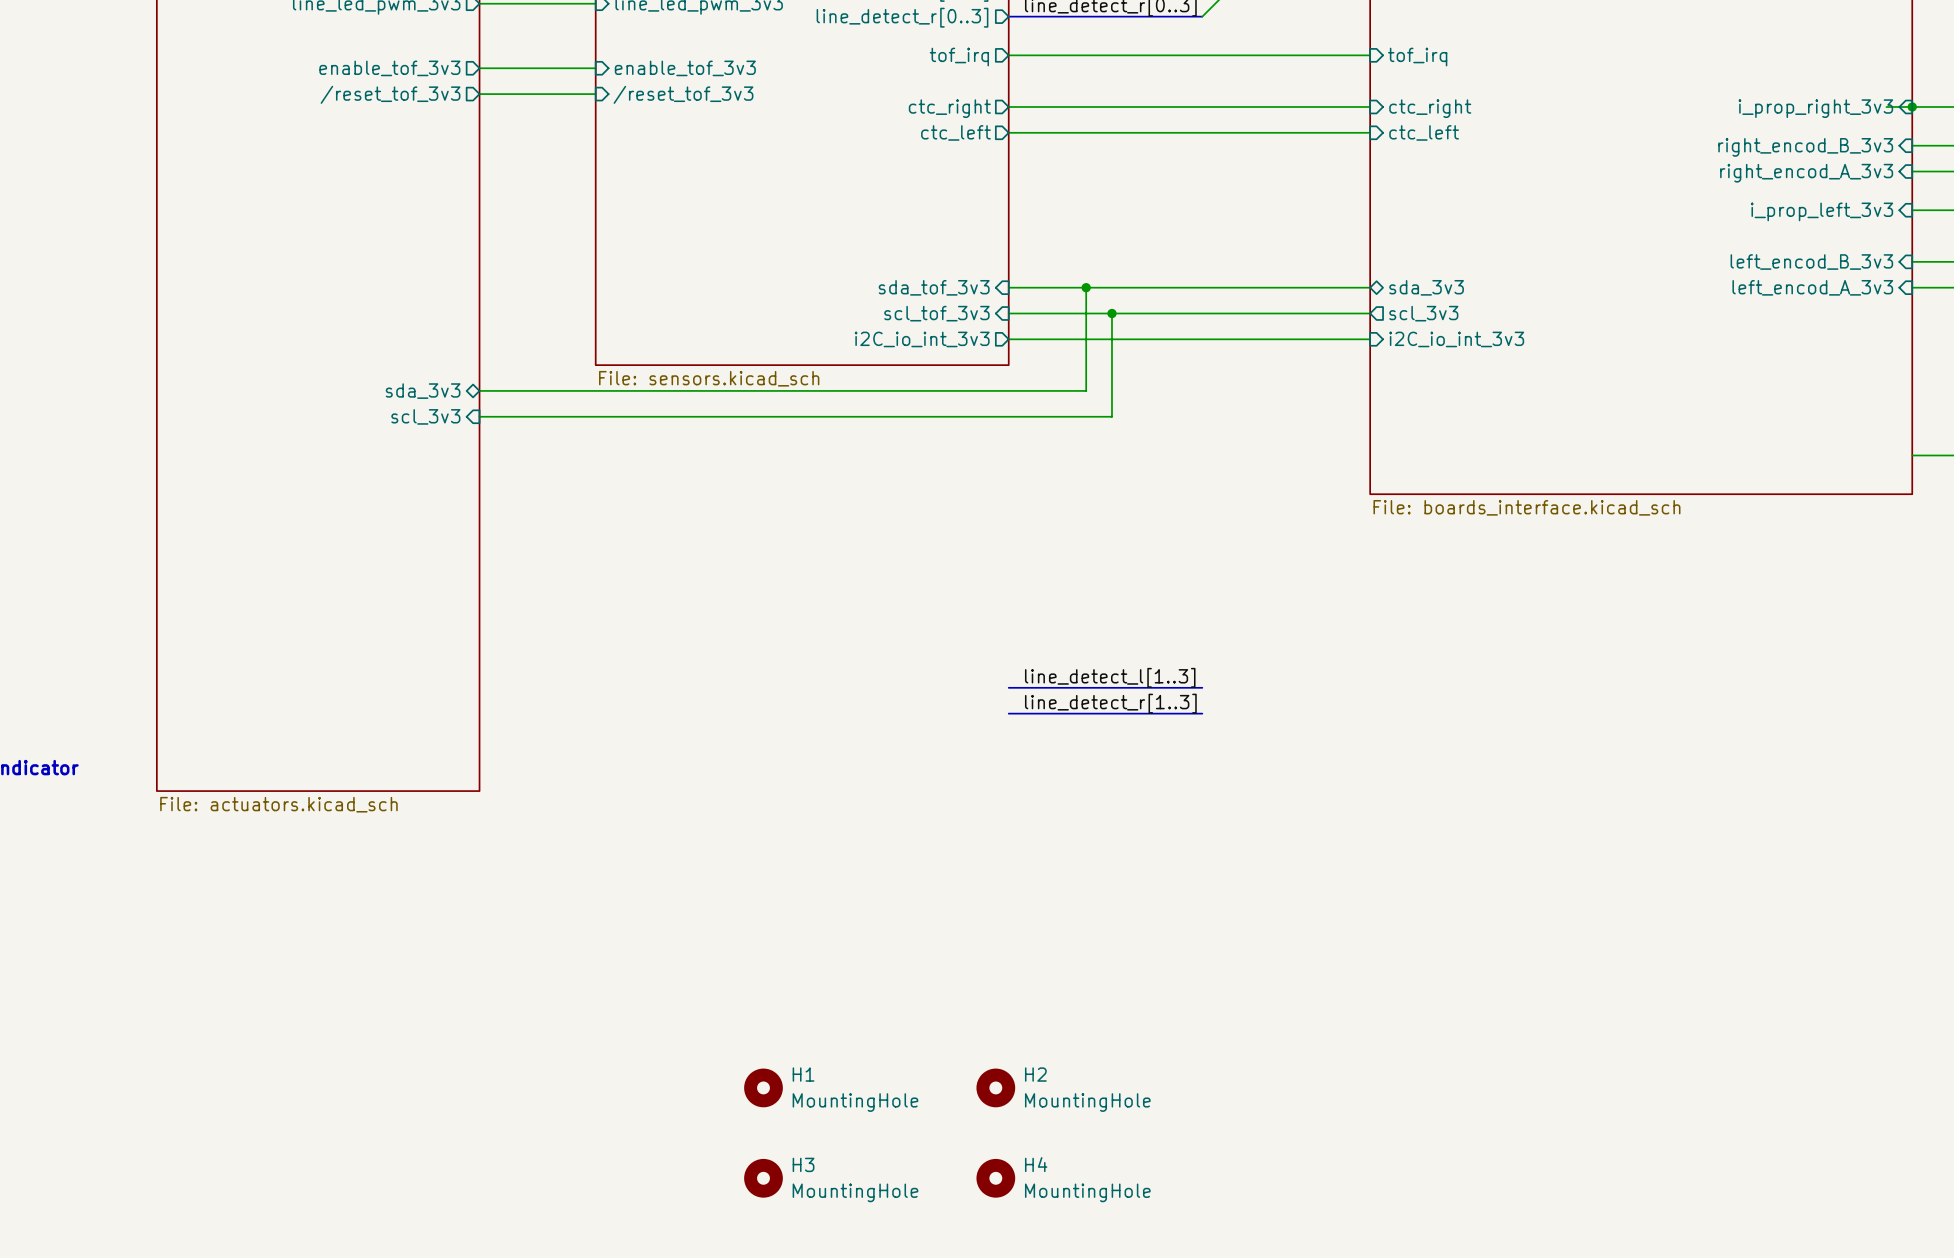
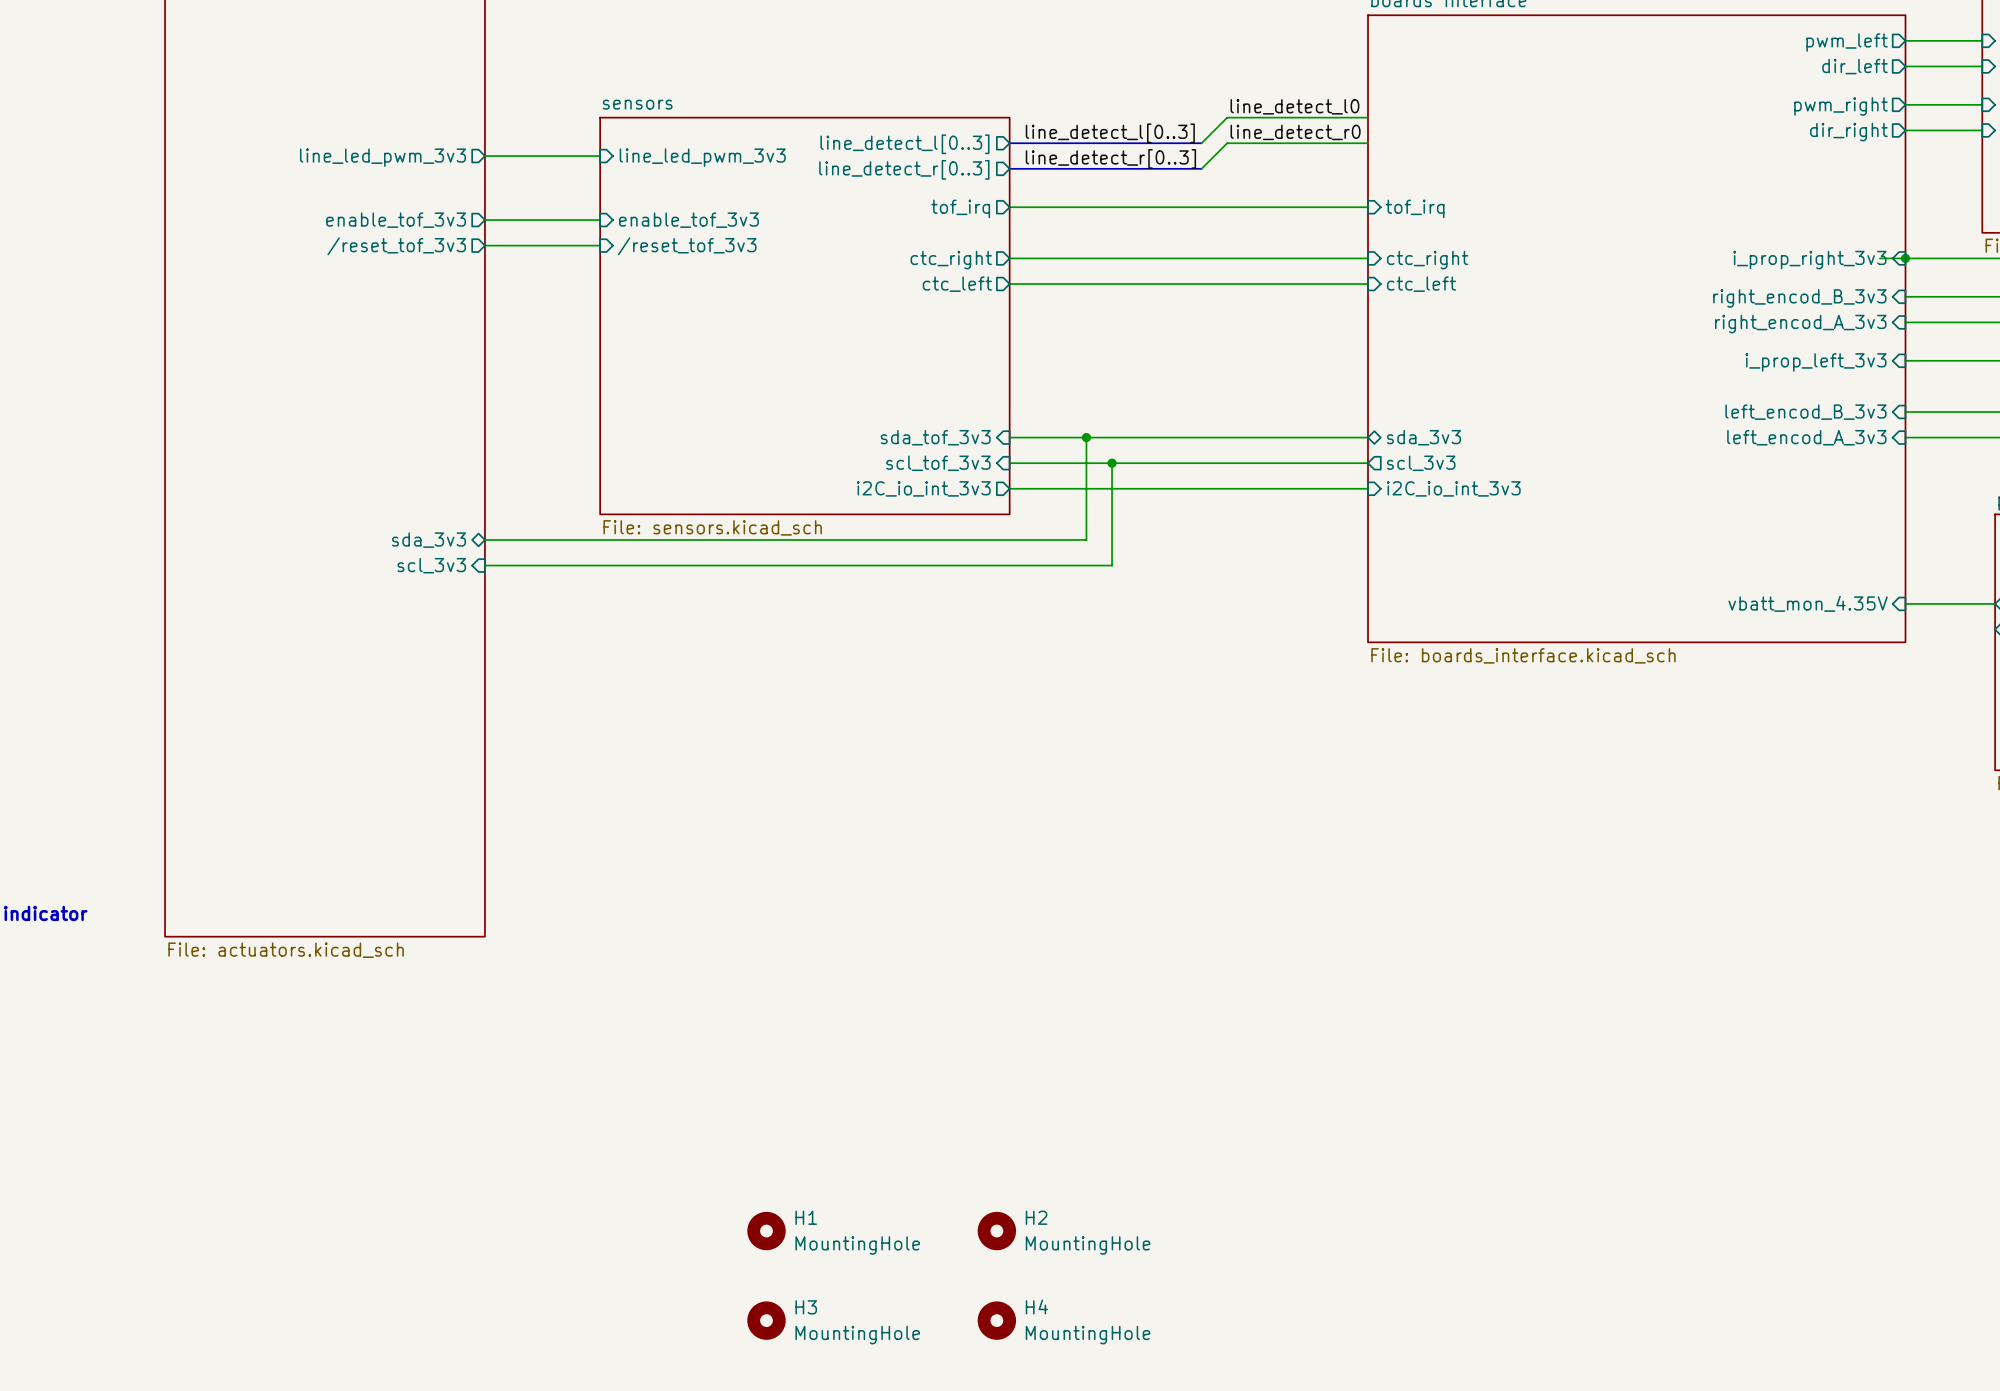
sheet pin: none -> vbatt_mon_4.35V (1808, 603)
label: line_detect_l[1..3] (1110, 677) -> none
bus: (1008, 687) (1202, 687) -> none
label: line_detect_r[1..3] (1110, 703) -> none
bus: (1008, 713) (1202, 713) -> none

